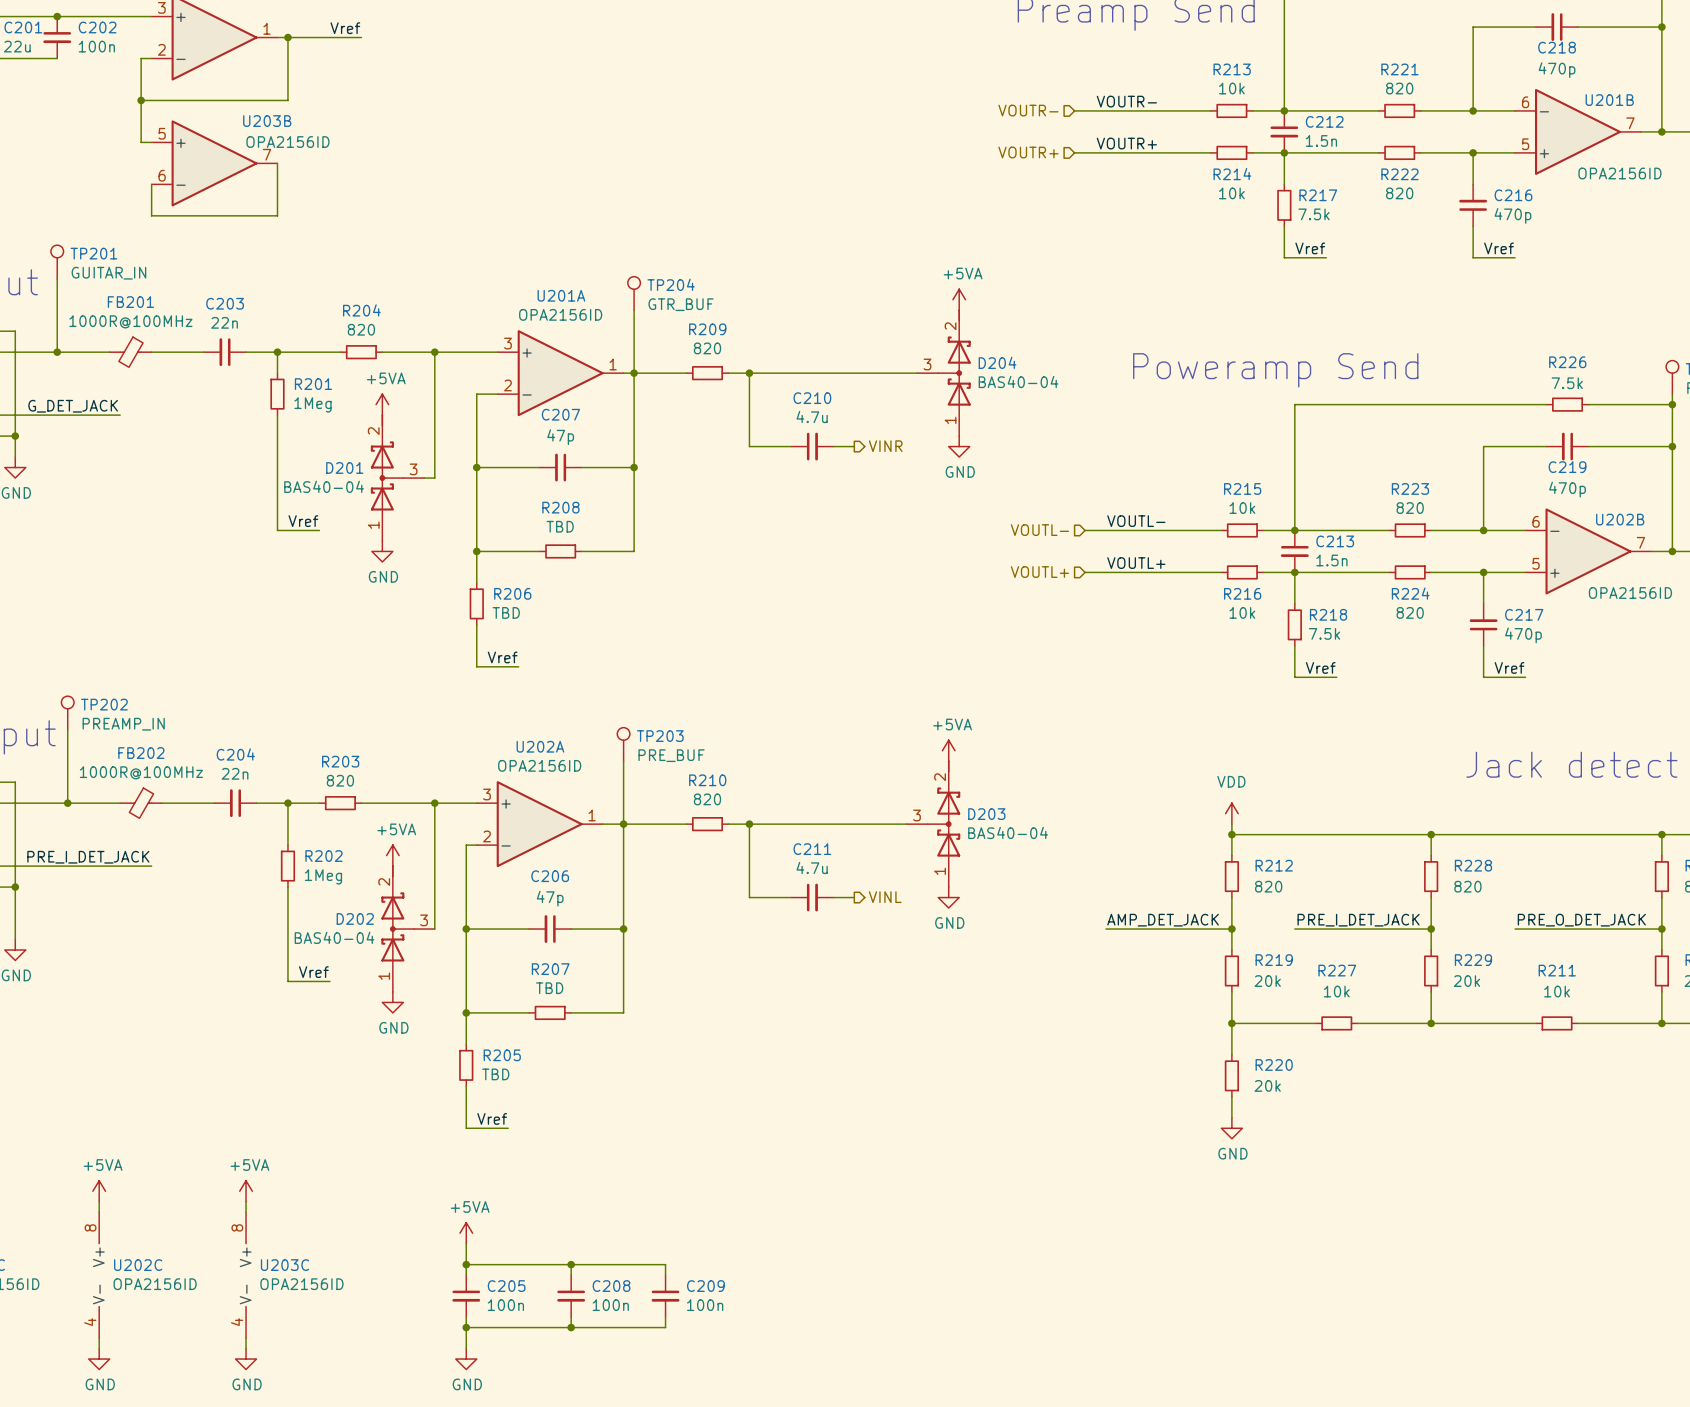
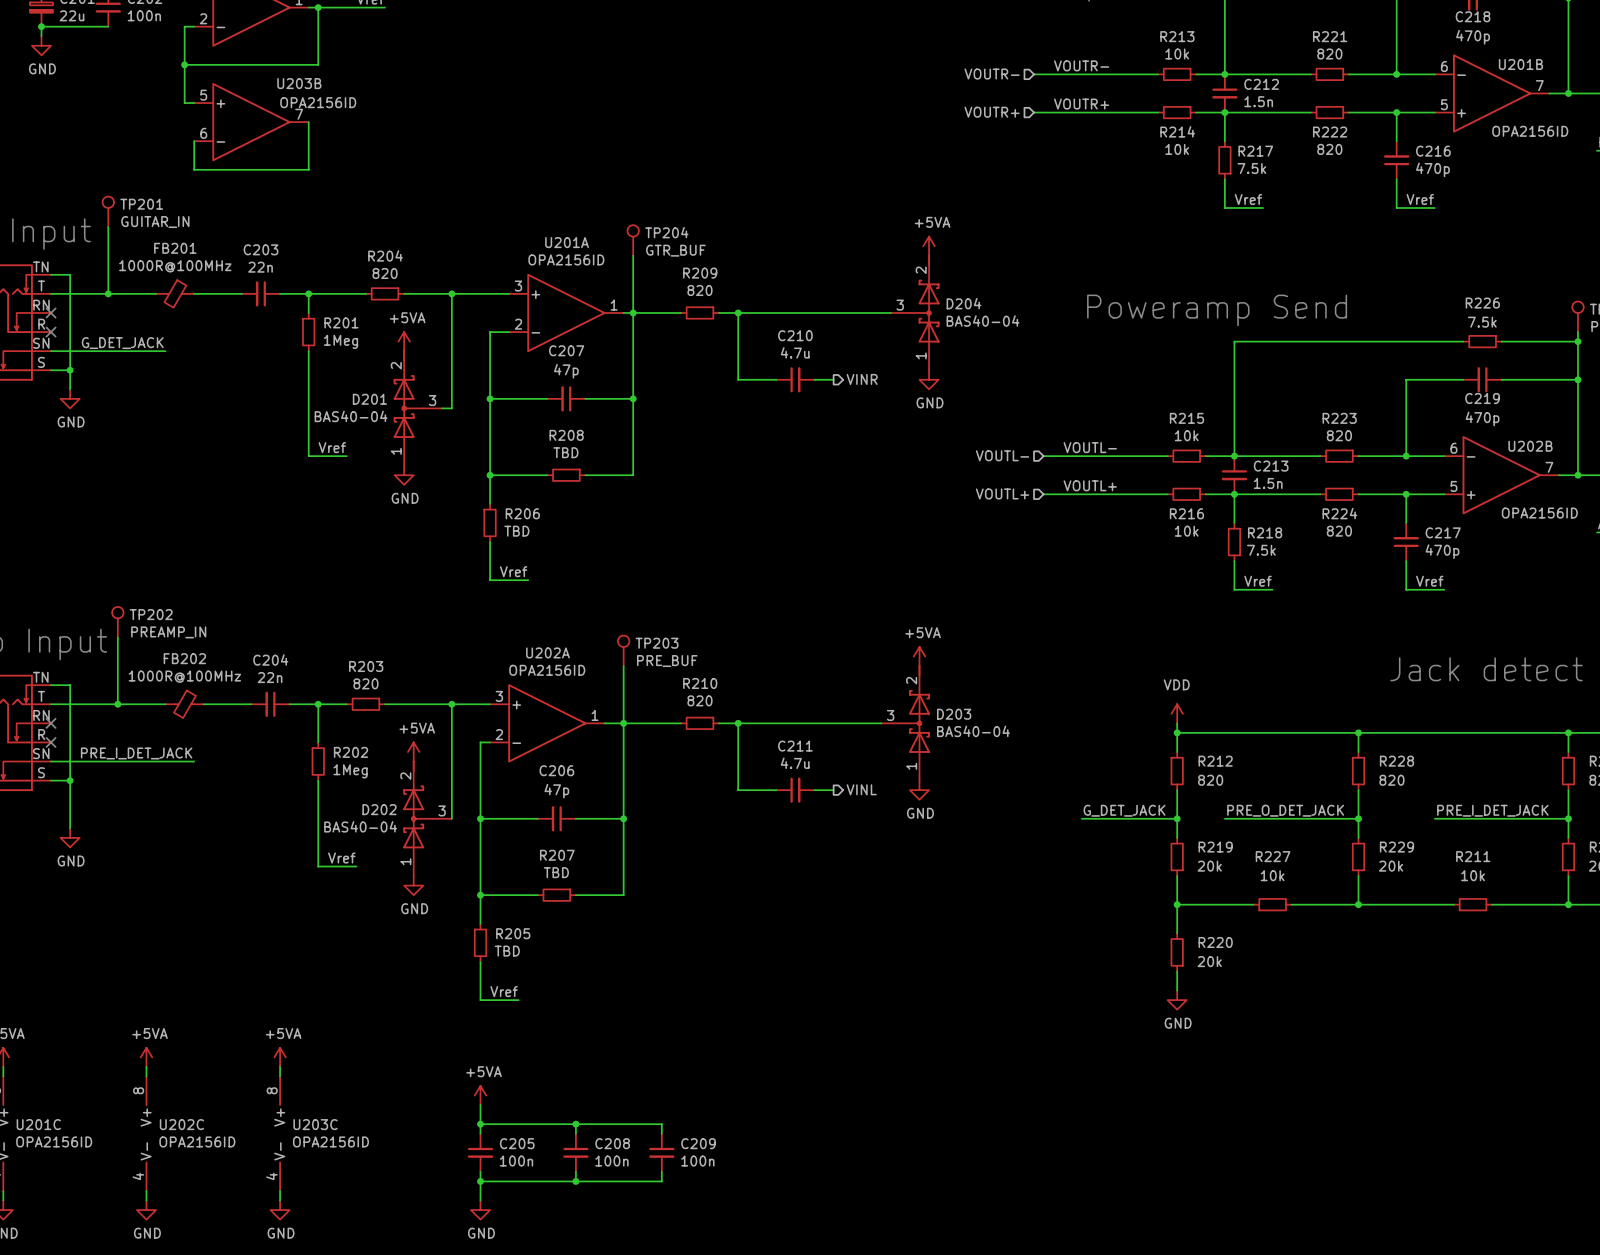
label: AMP_DET_JACK (1163, 920) -> G_DET_JACK (1124, 810)
label: PRE_I_DET_JACK (1358, 920) -> PRE_O_DET_JACK (1285, 810)
label: PRE_O_DET_JACK (1581, 920) -> PRE_I_DET_JACK (1492, 810)
wire: (1106, 929) (1127, 929) -> none
wire: none -> (1224, 818) (1234, 818)

